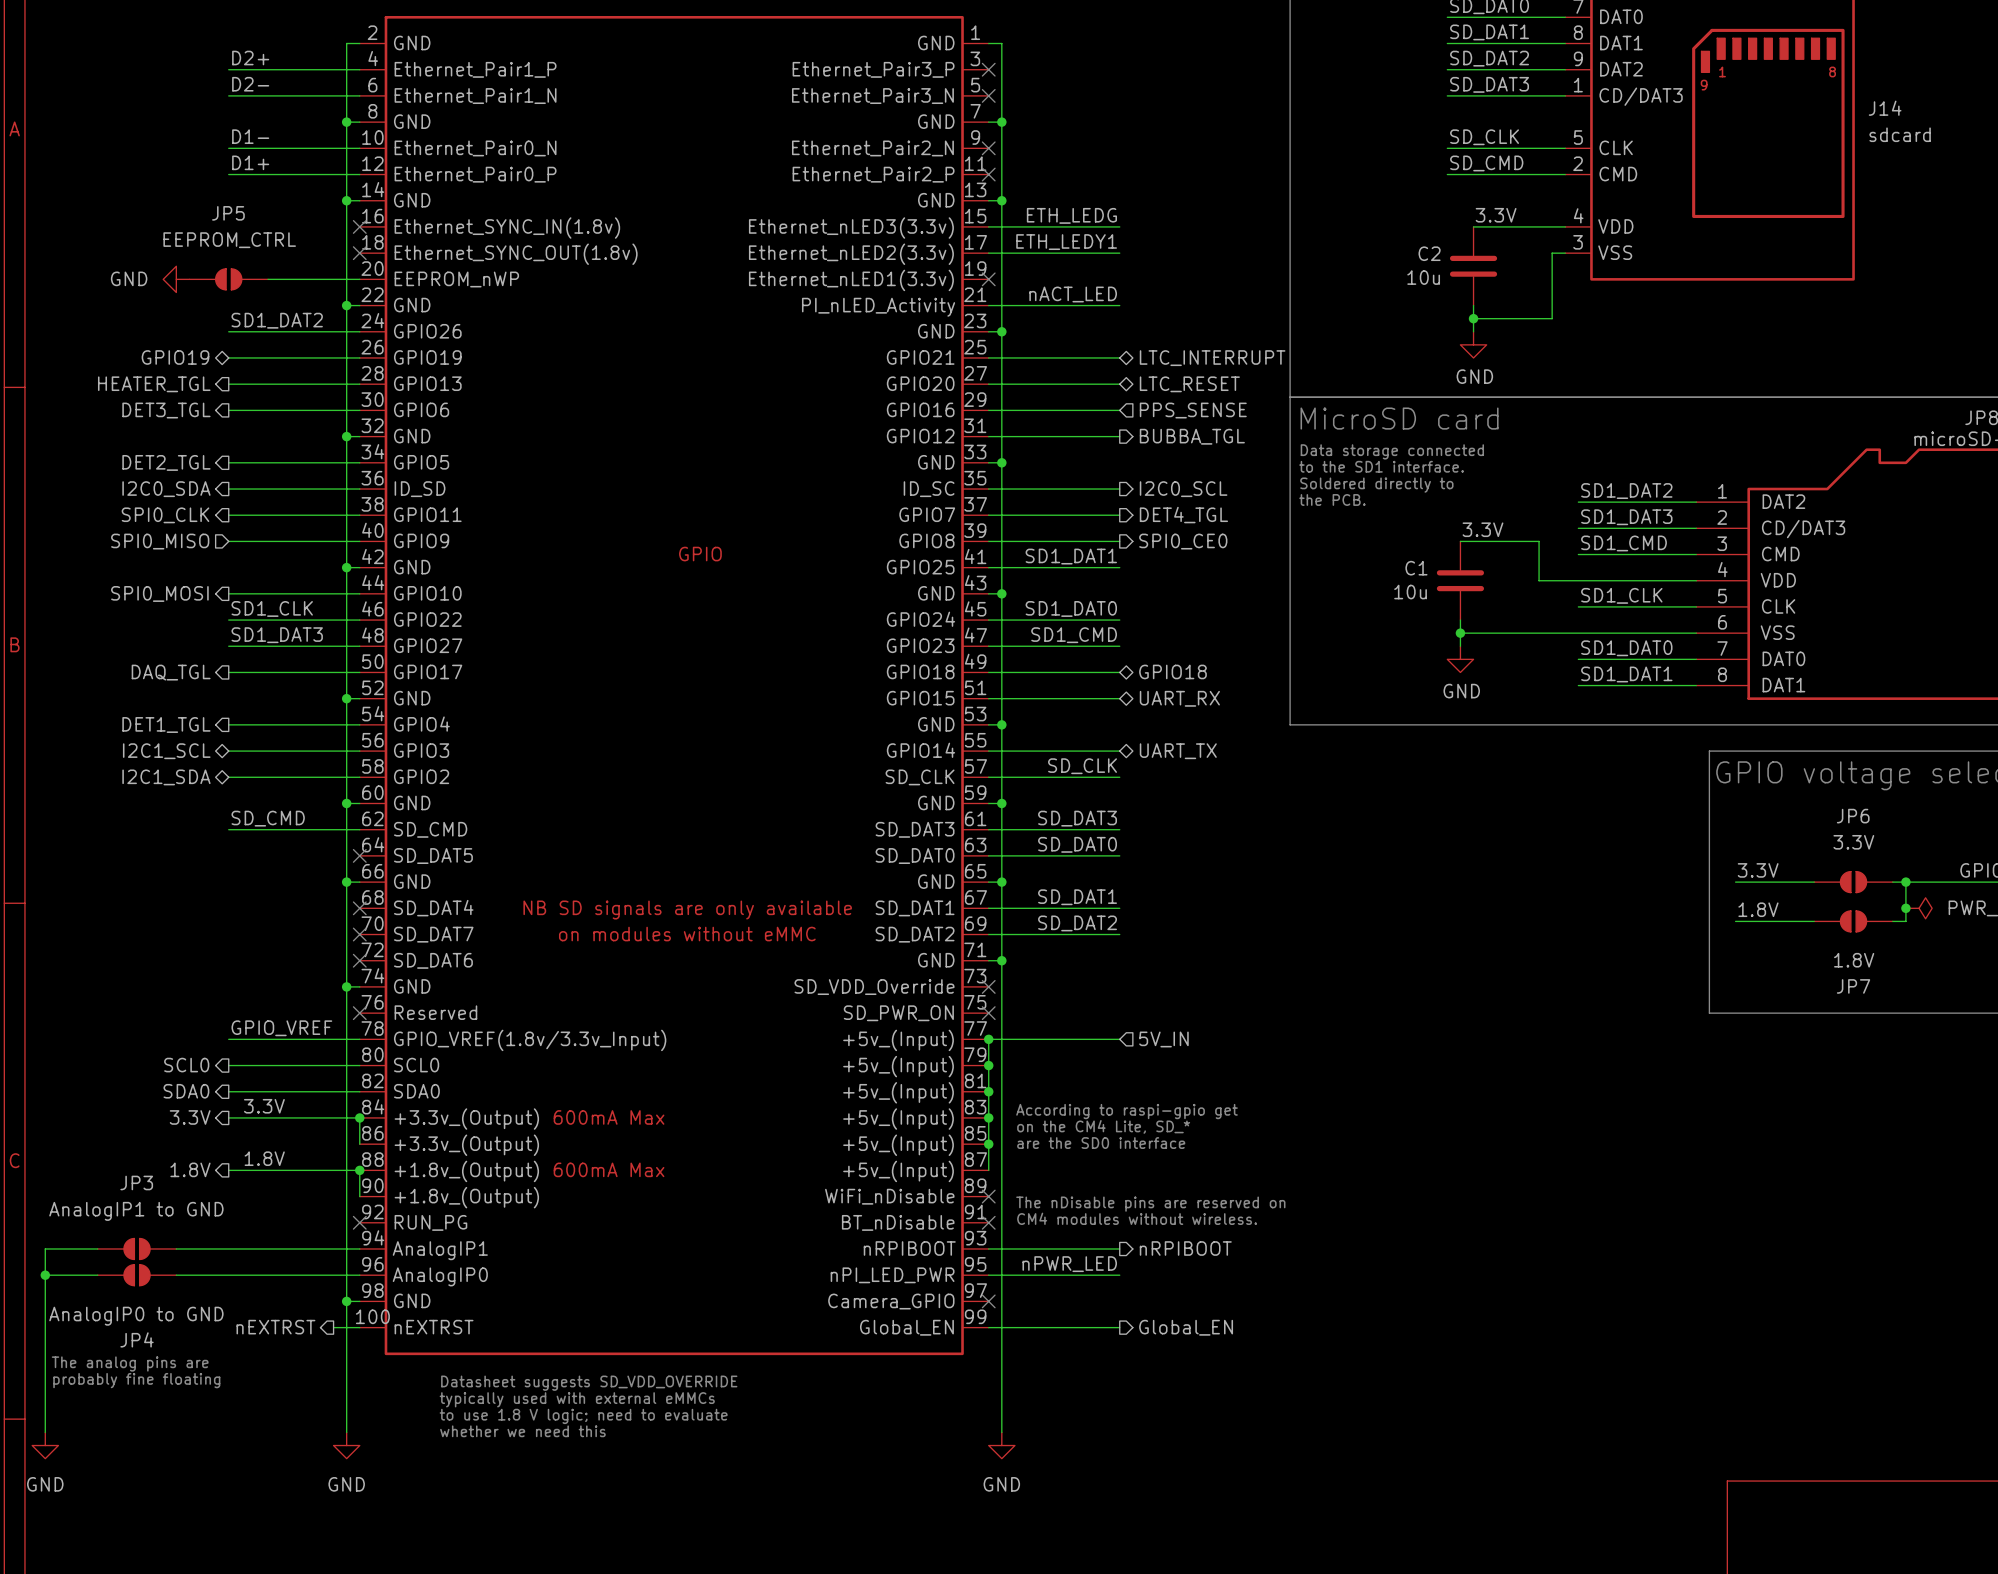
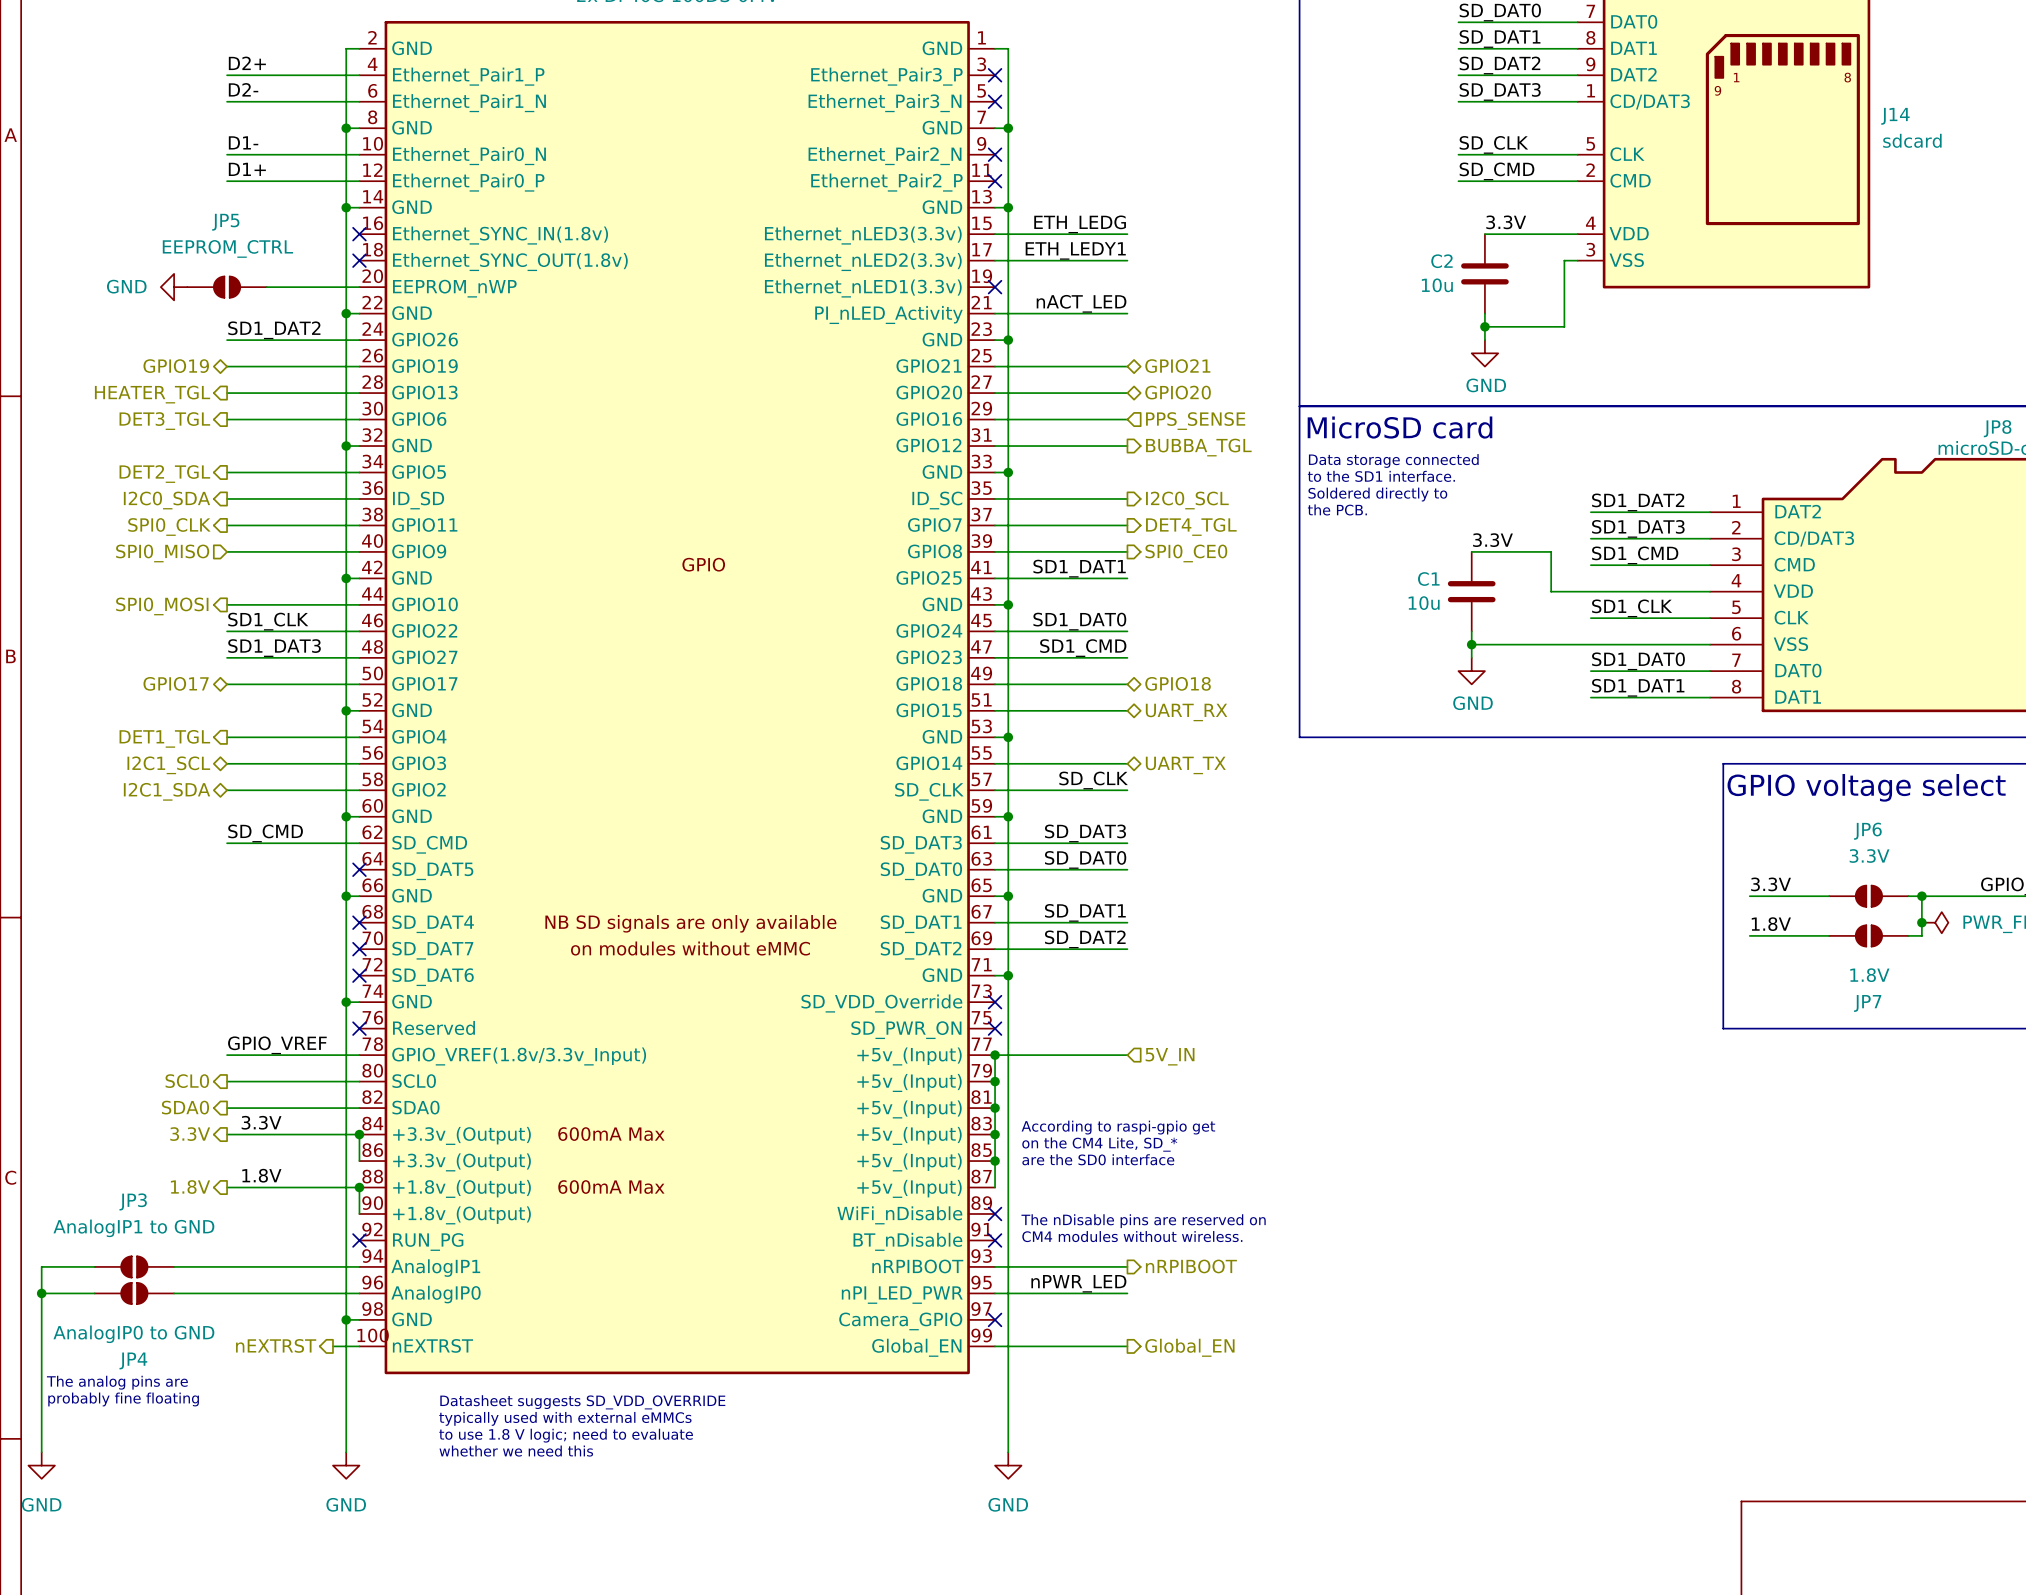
hierarchical label: LTC_INTERRUPT (1212, 358) -> GPIO21 (1177, 366)
hierarchical label: LTC_RESET (1189, 384) -> GPIO20 (1178, 392)
hierarchical label shape: output (171, 672) -> bidirectional (176, 683)
hierarchical label: DAQ_TGL (171, 672) -> GPIO17 (176, 683)

